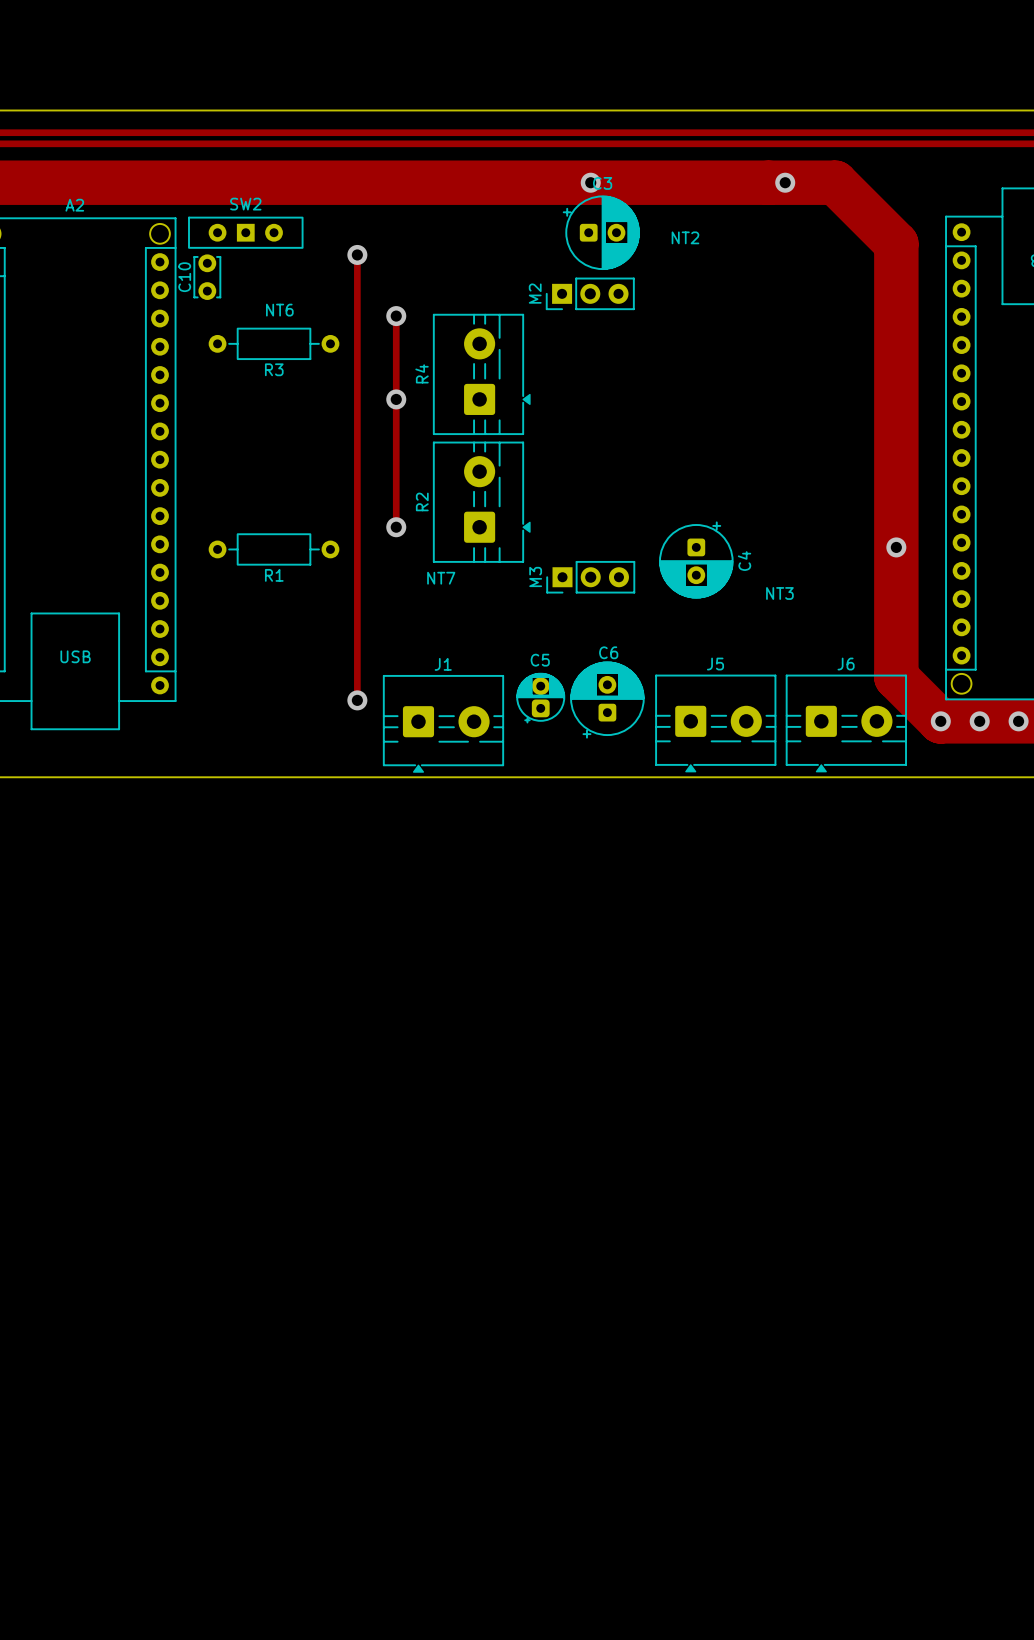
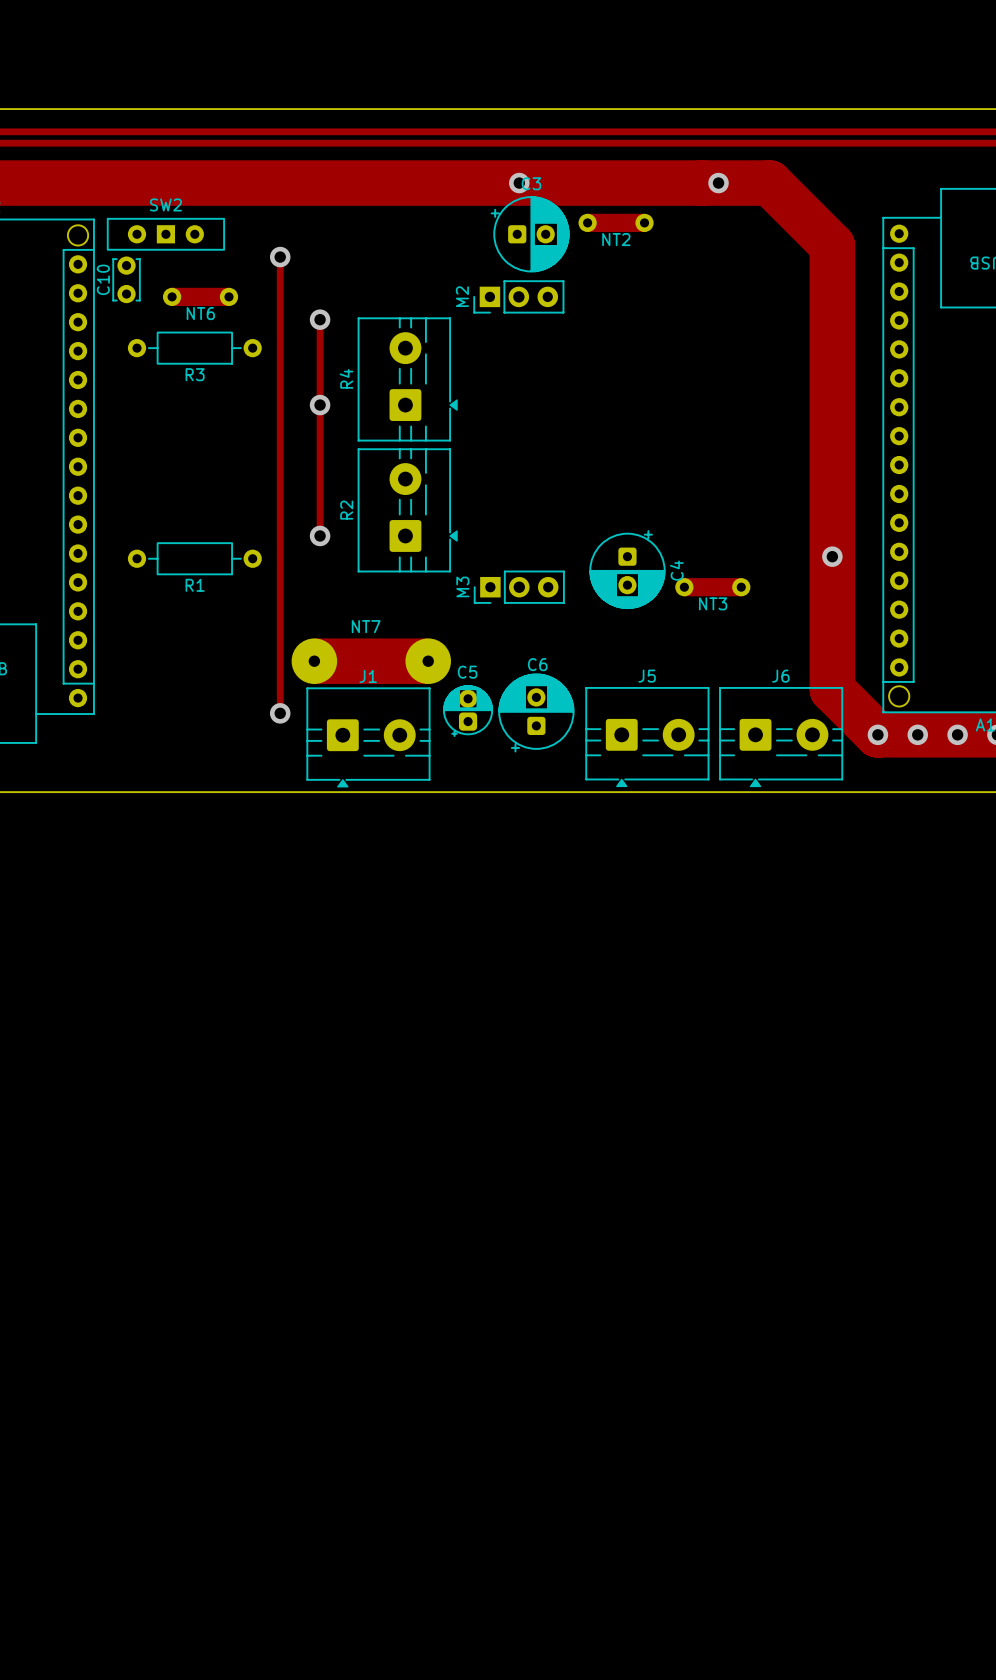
NT2 footprint: [671, 231, 699, 244] -> [578, 213, 654, 233]
NT6 footprint: [266, 303, 294, 317] -> [162, 287, 239, 307]
NT7 footprint: [427, 572, 456, 585] -> [291, 638, 451, 684]
NT7 name position: NT7 (441, 578) -> NT7 (366, 626)
NT3 footprint: [766, 587, 794, 600] -> [675, 578, 751, 597]

